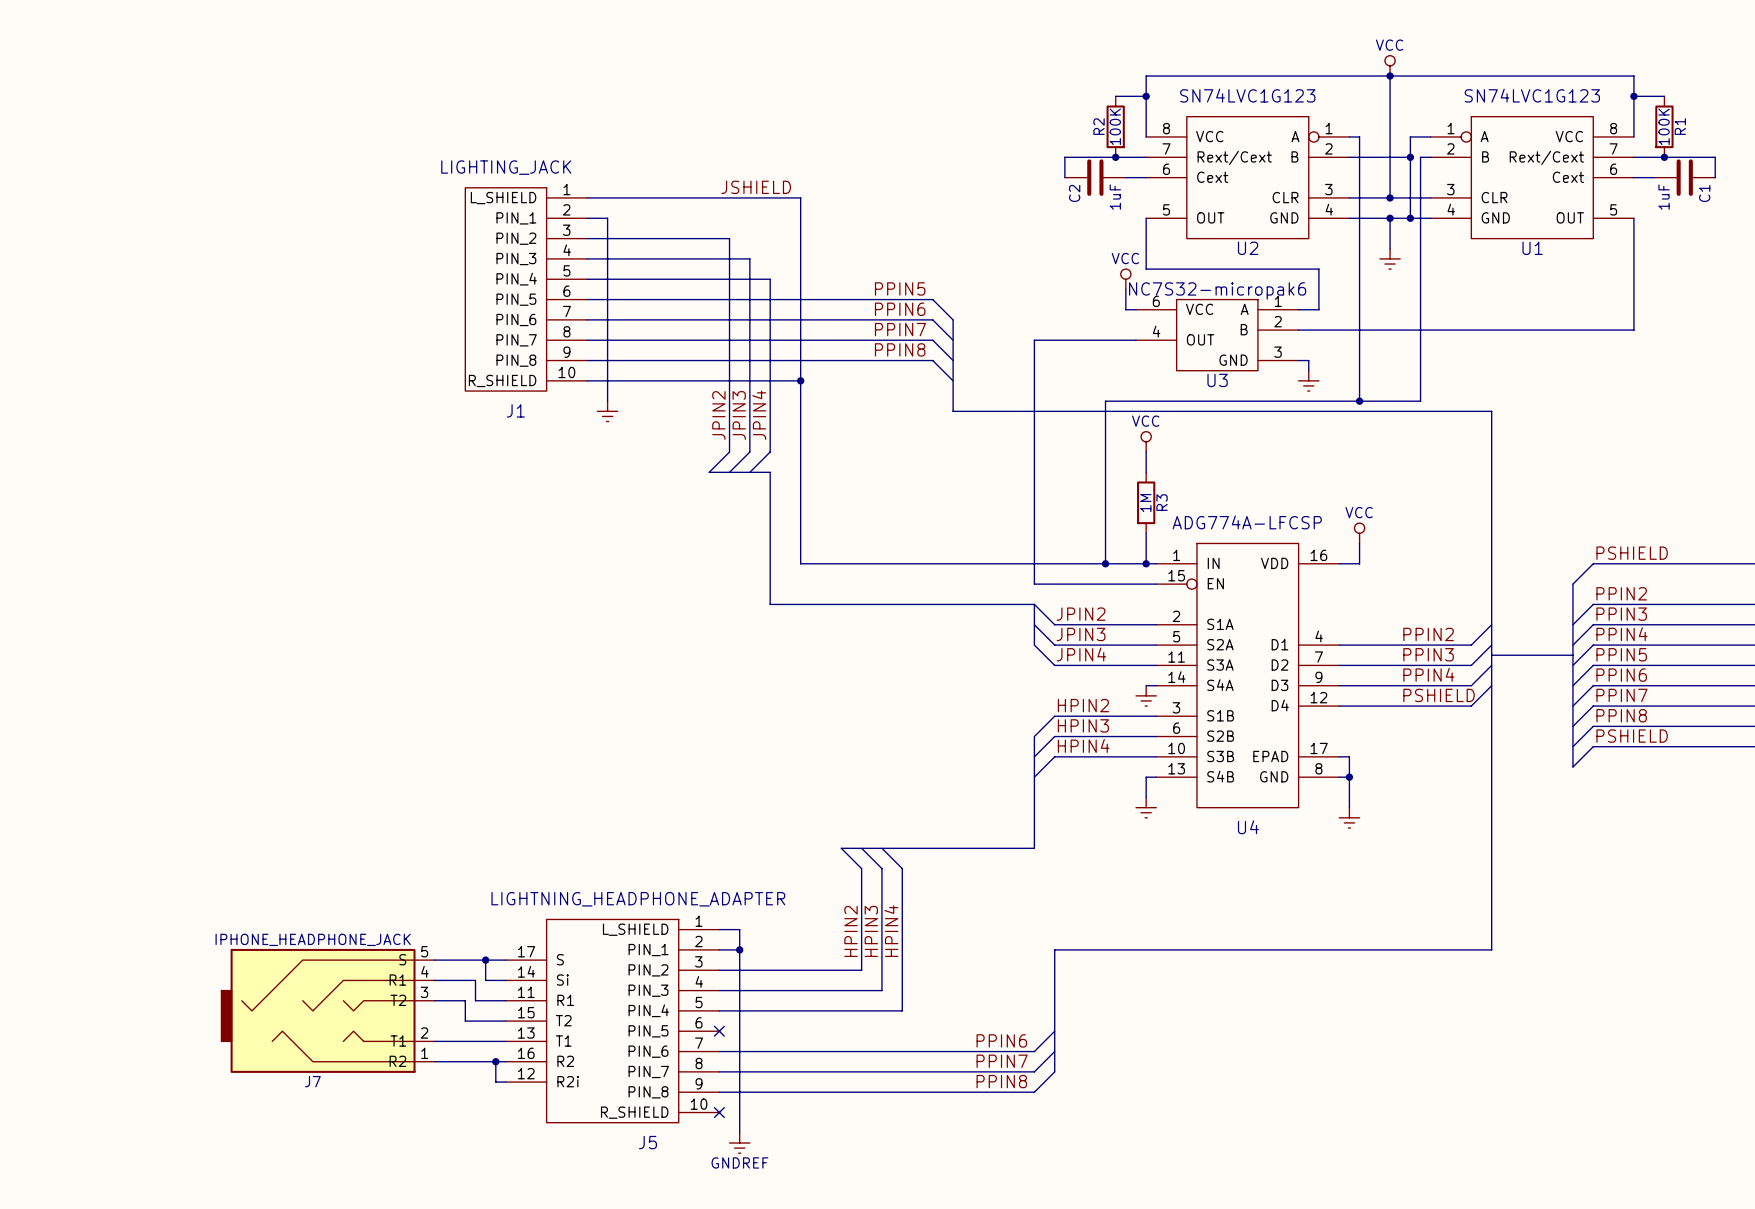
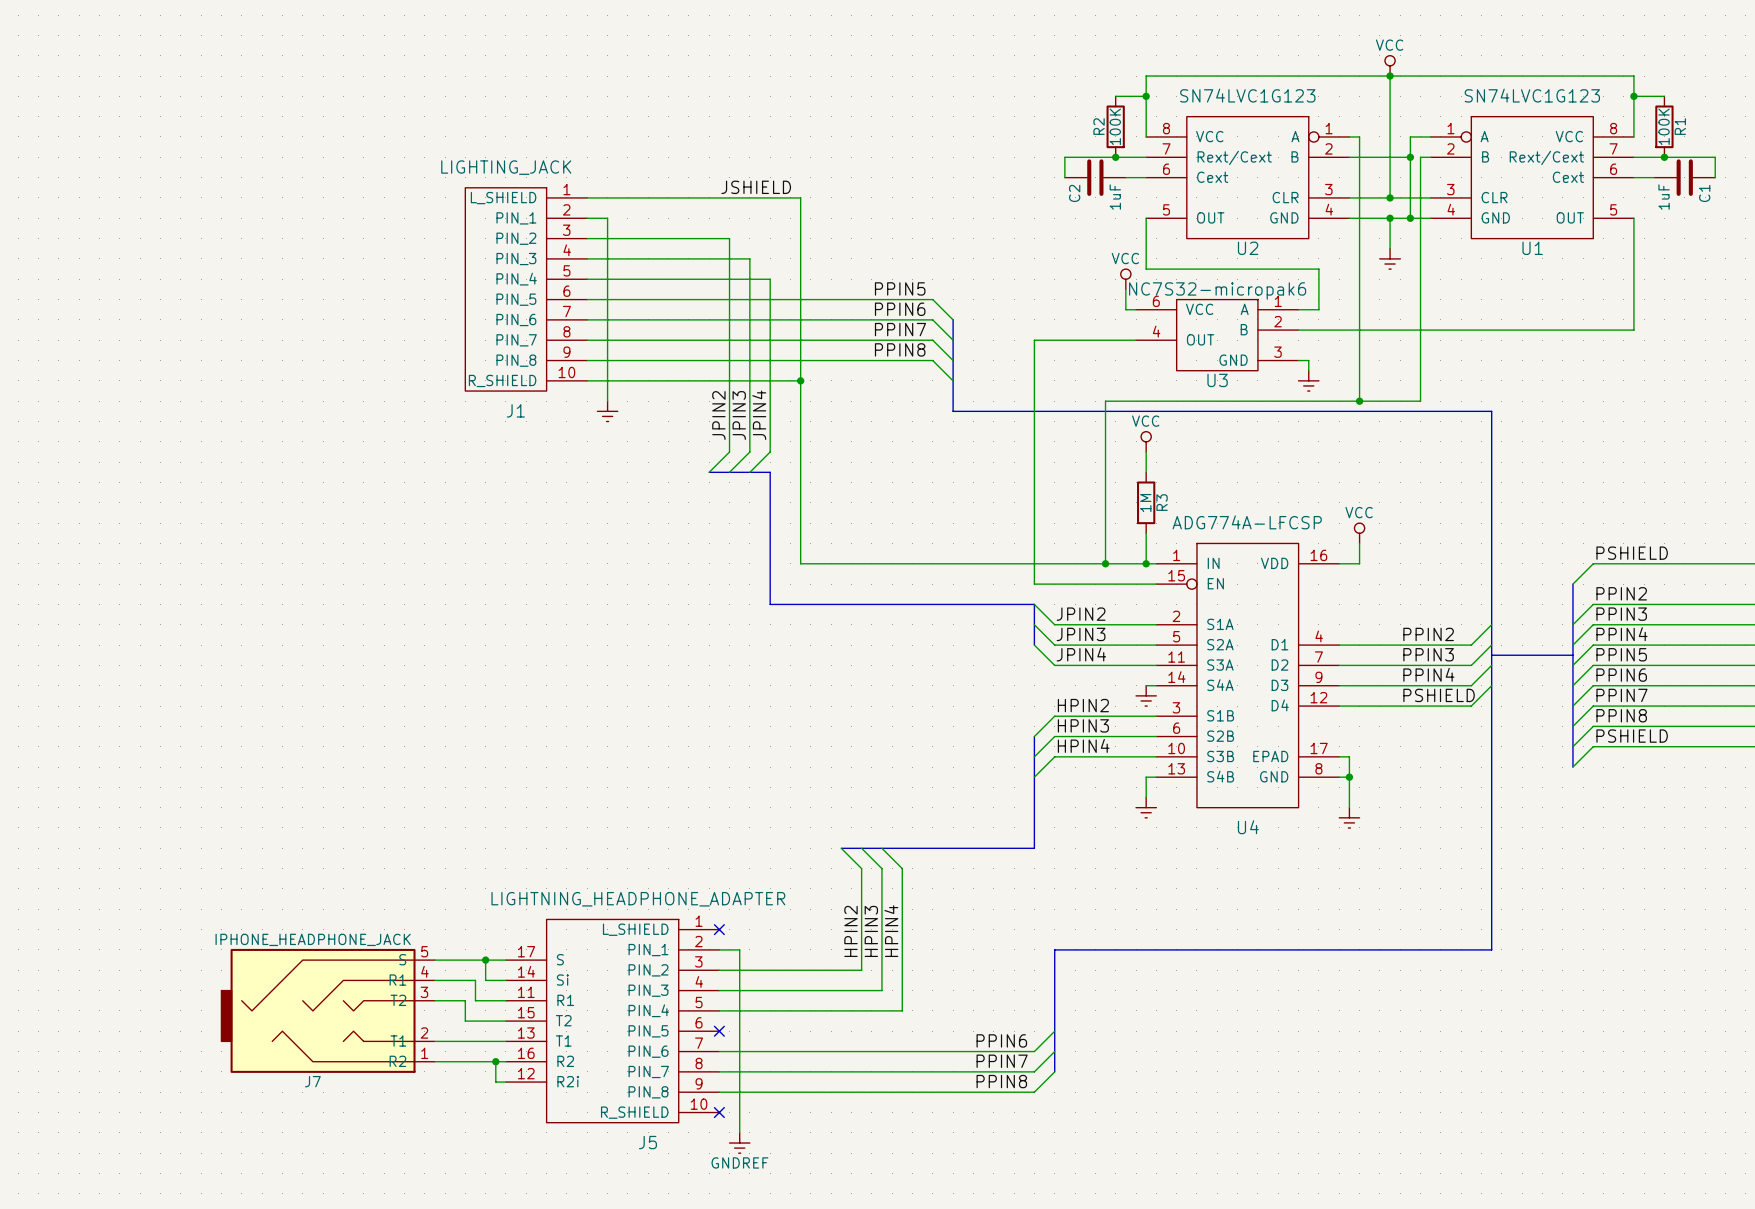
wire: (719, 929) (739, 929) (739, 949) -> none
no-connect mark: none -> (719, 929)
junction: (739, 949) -> none

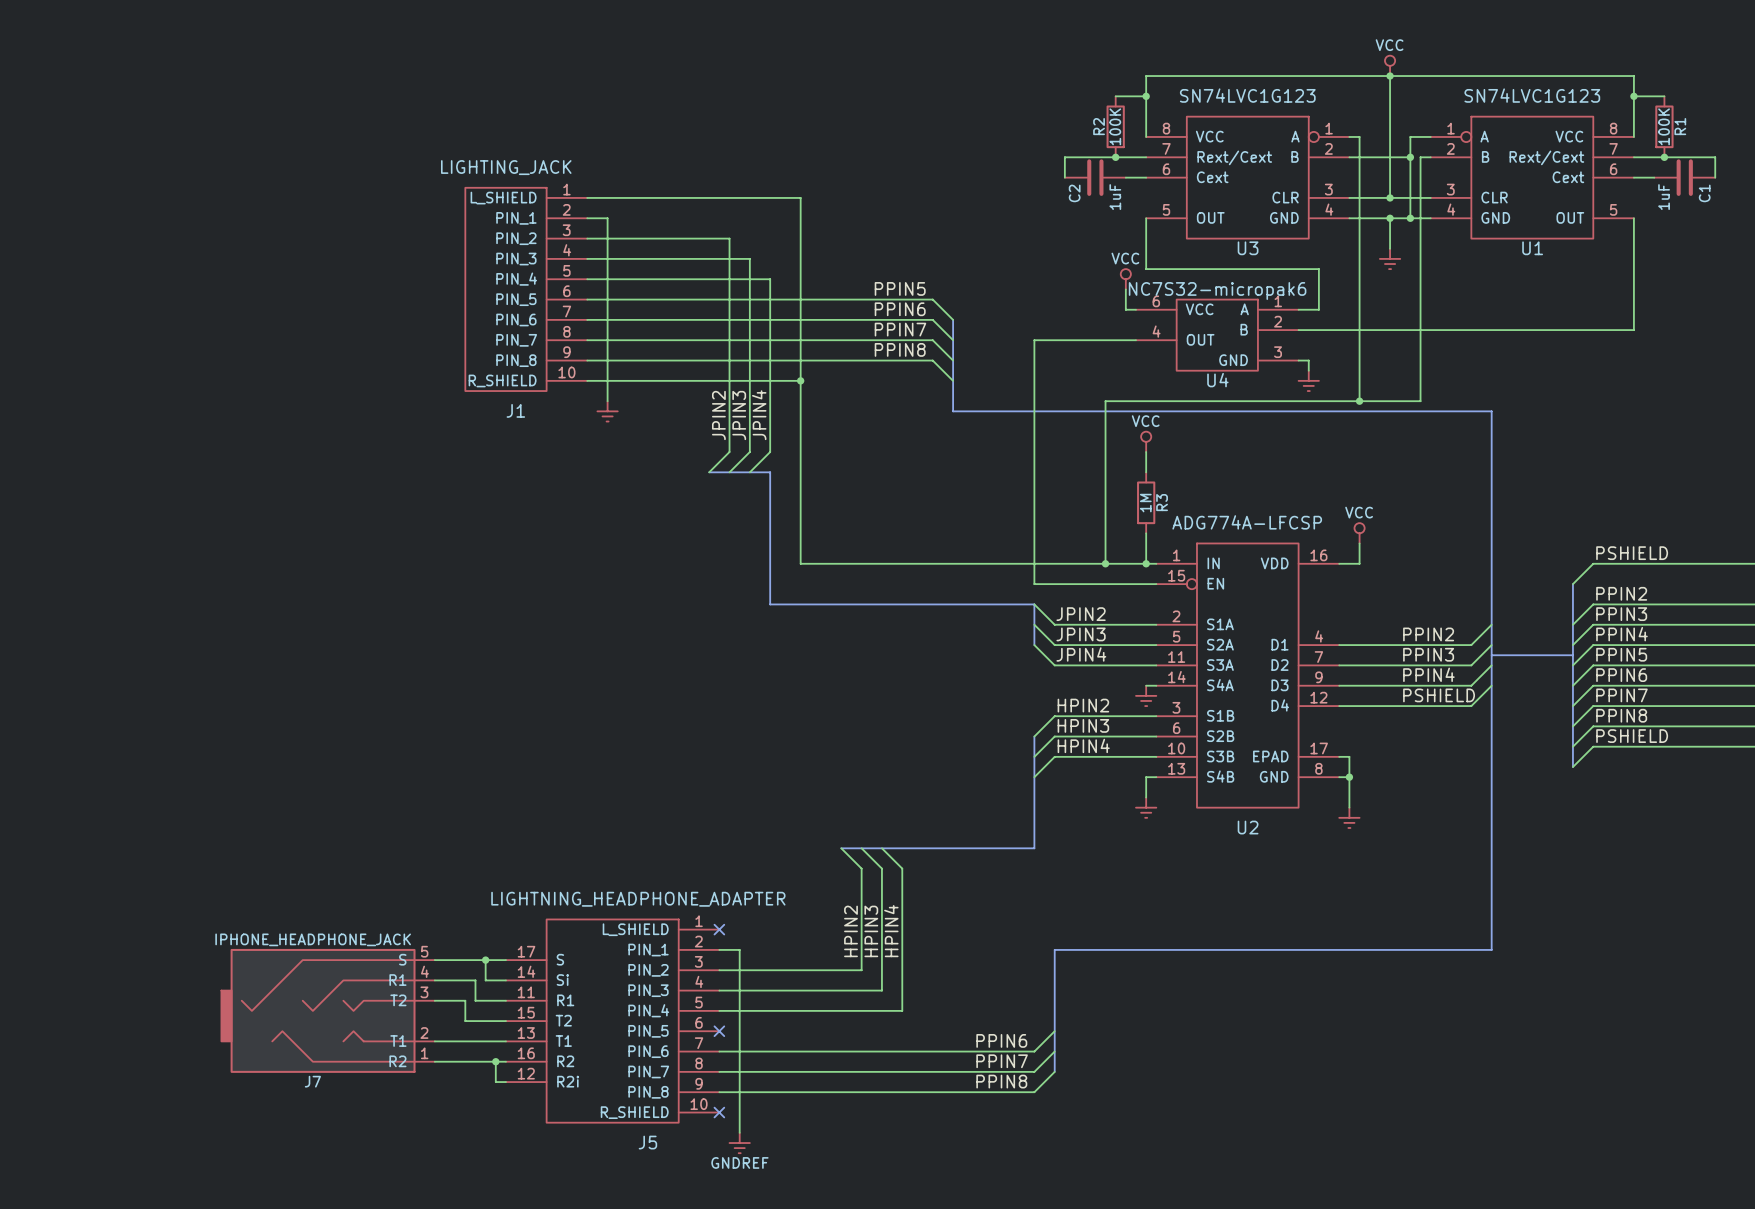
label: JSHIELD (756, 187) -> none
U2 name: U2 (1248, 248) -> U3 (1248, 248)
U3 name: U3 (1217, 380) -> U4 (1217, 380)
U4 name: U4 (1248, 827) -> U2 (1248, 827)

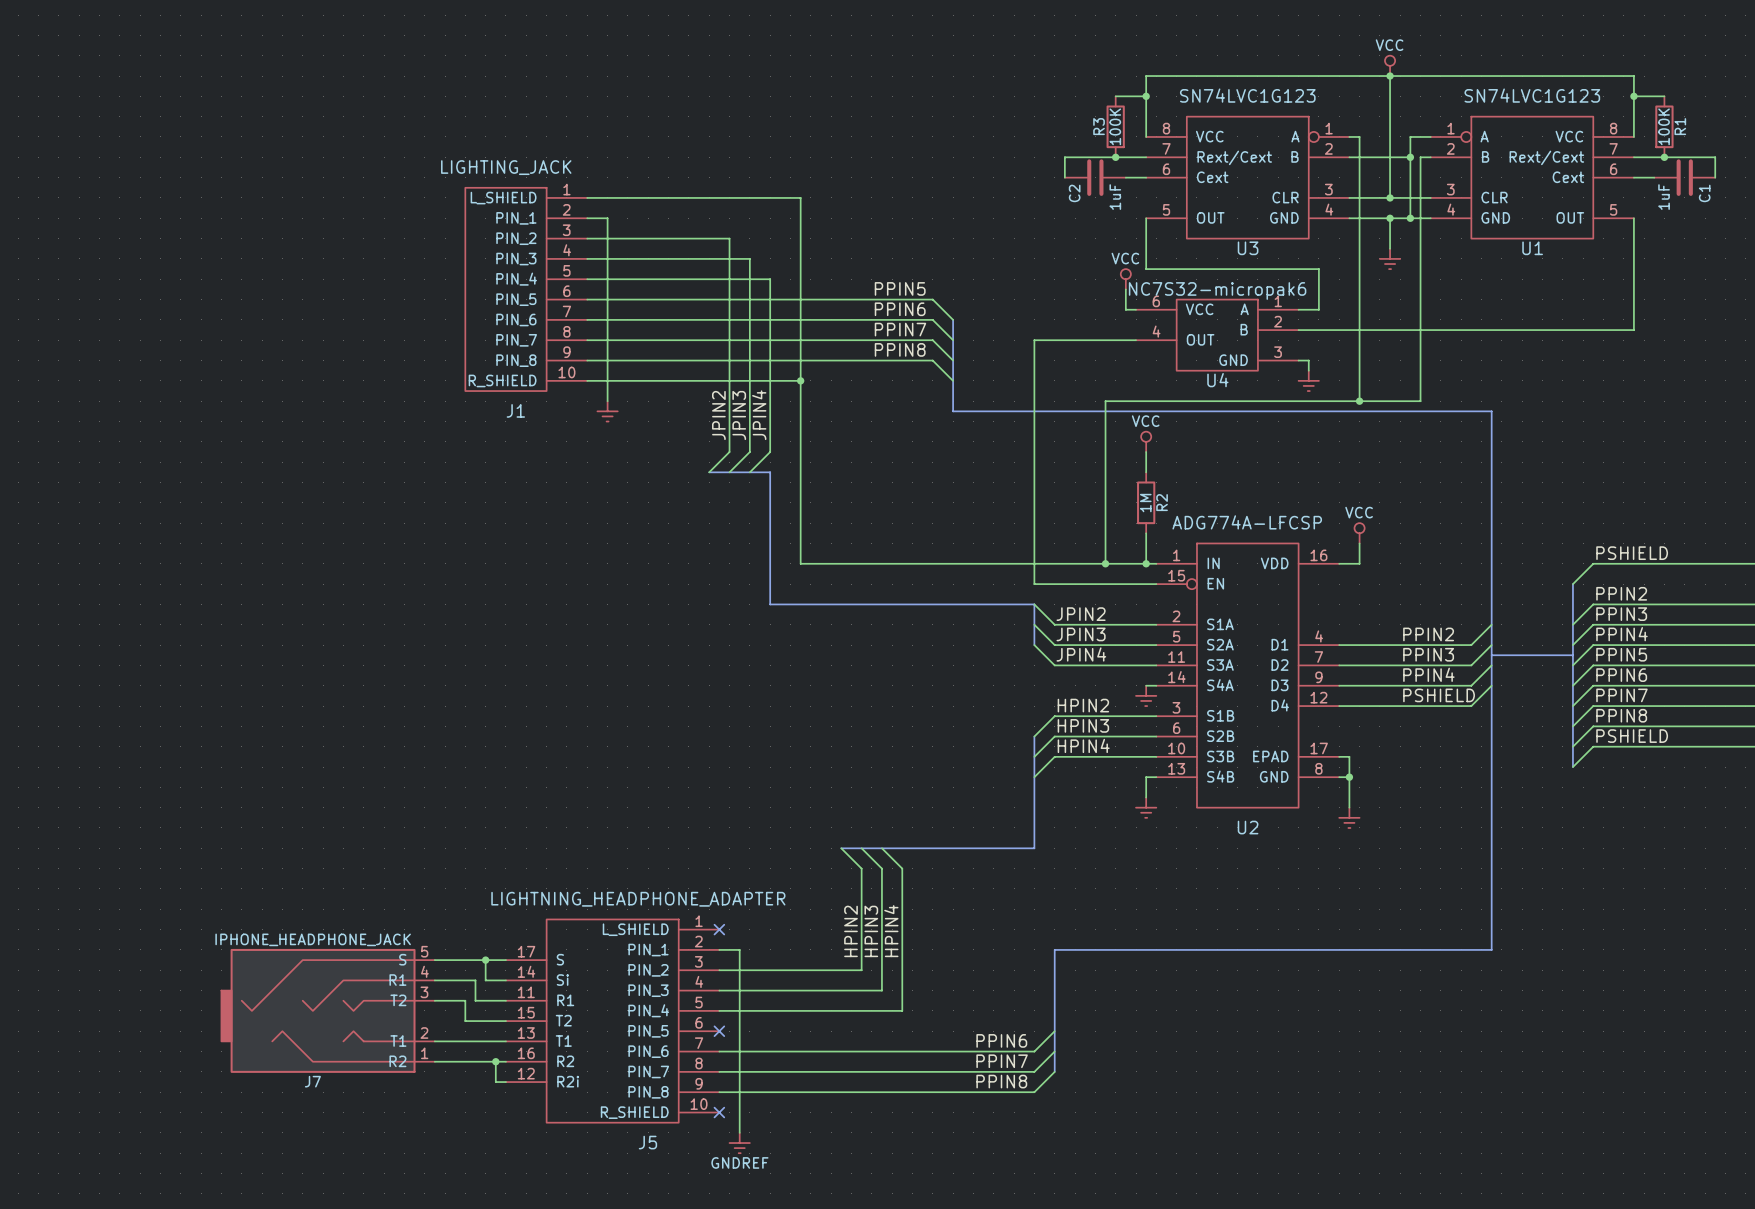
R2 name: R2 (1099, 126) -> R3 (1099, 126)
R3 name: R3 (1162, 502) -> R2 (1162, 502)

